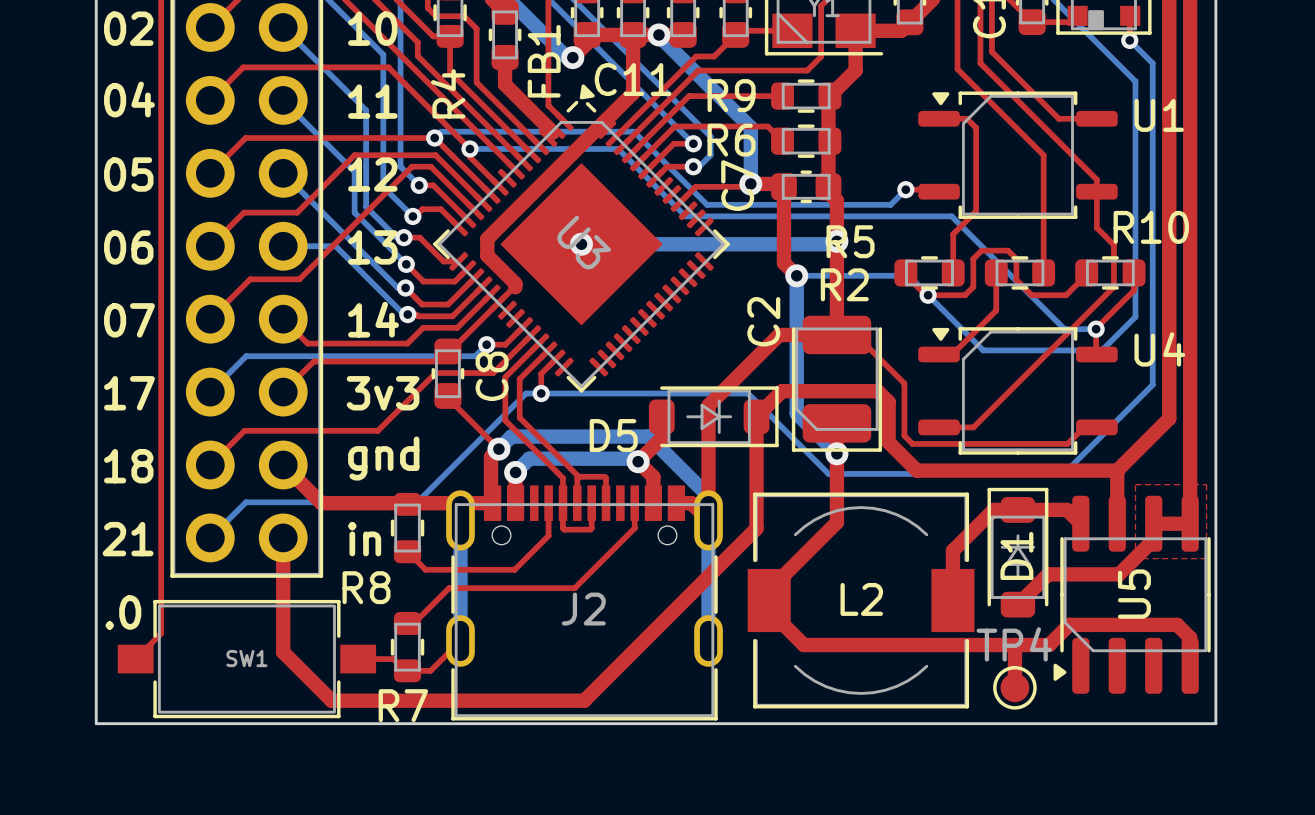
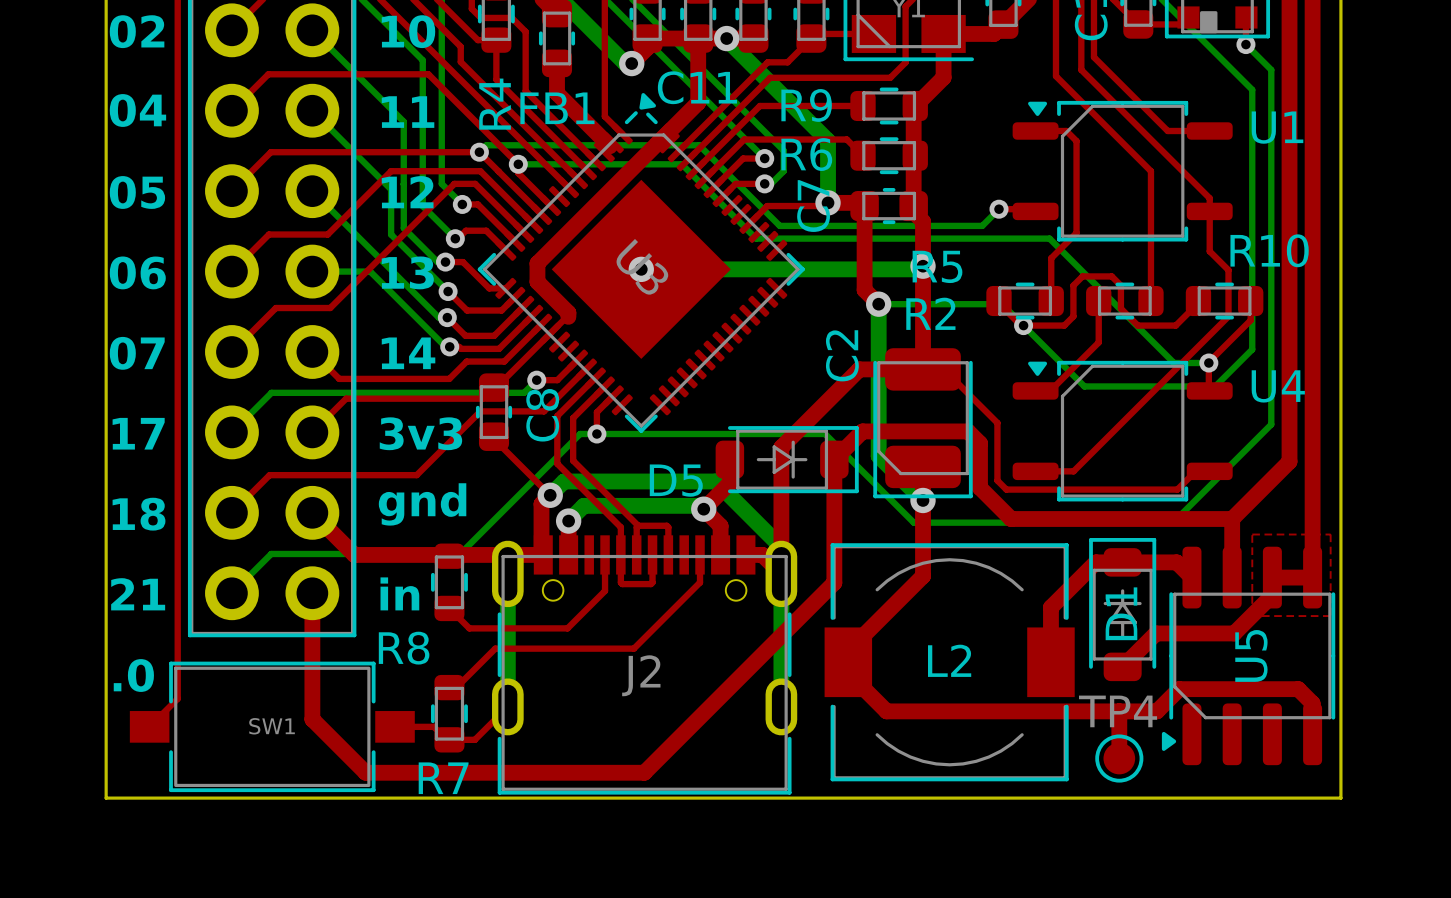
FB1 name rotation: 0° (544, 61) -> 90° clockwise (557, 108)

